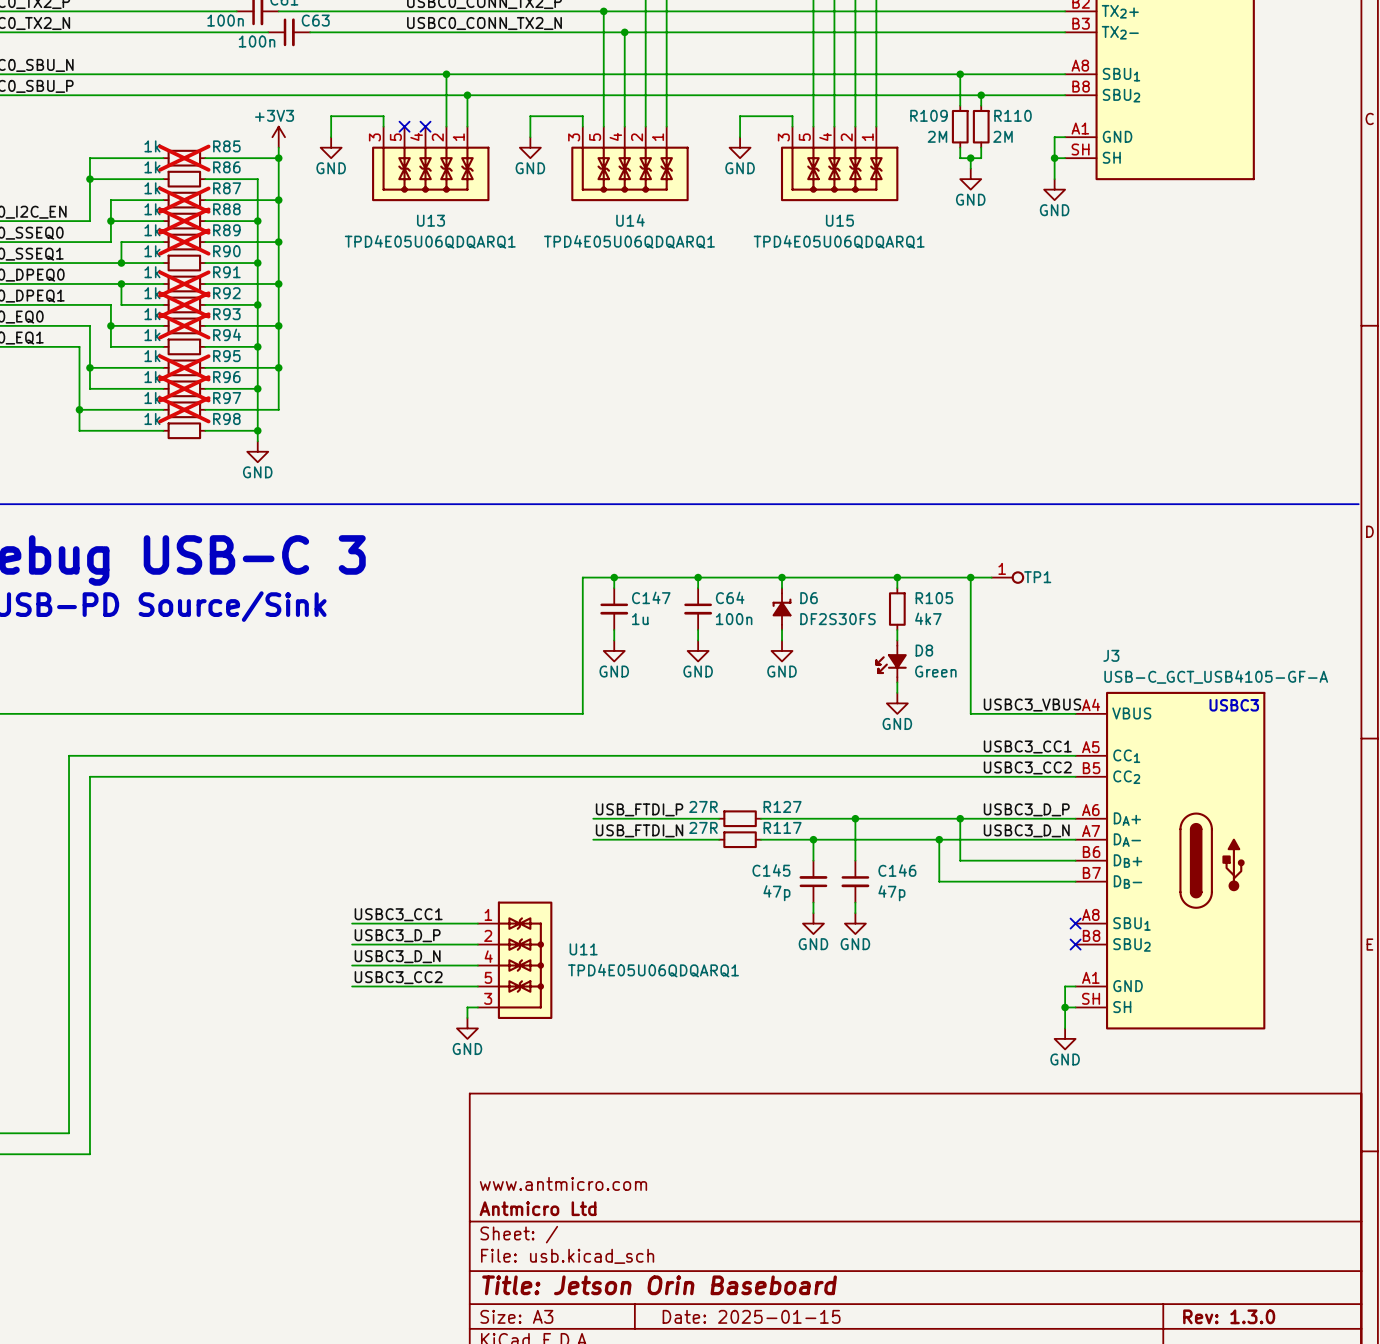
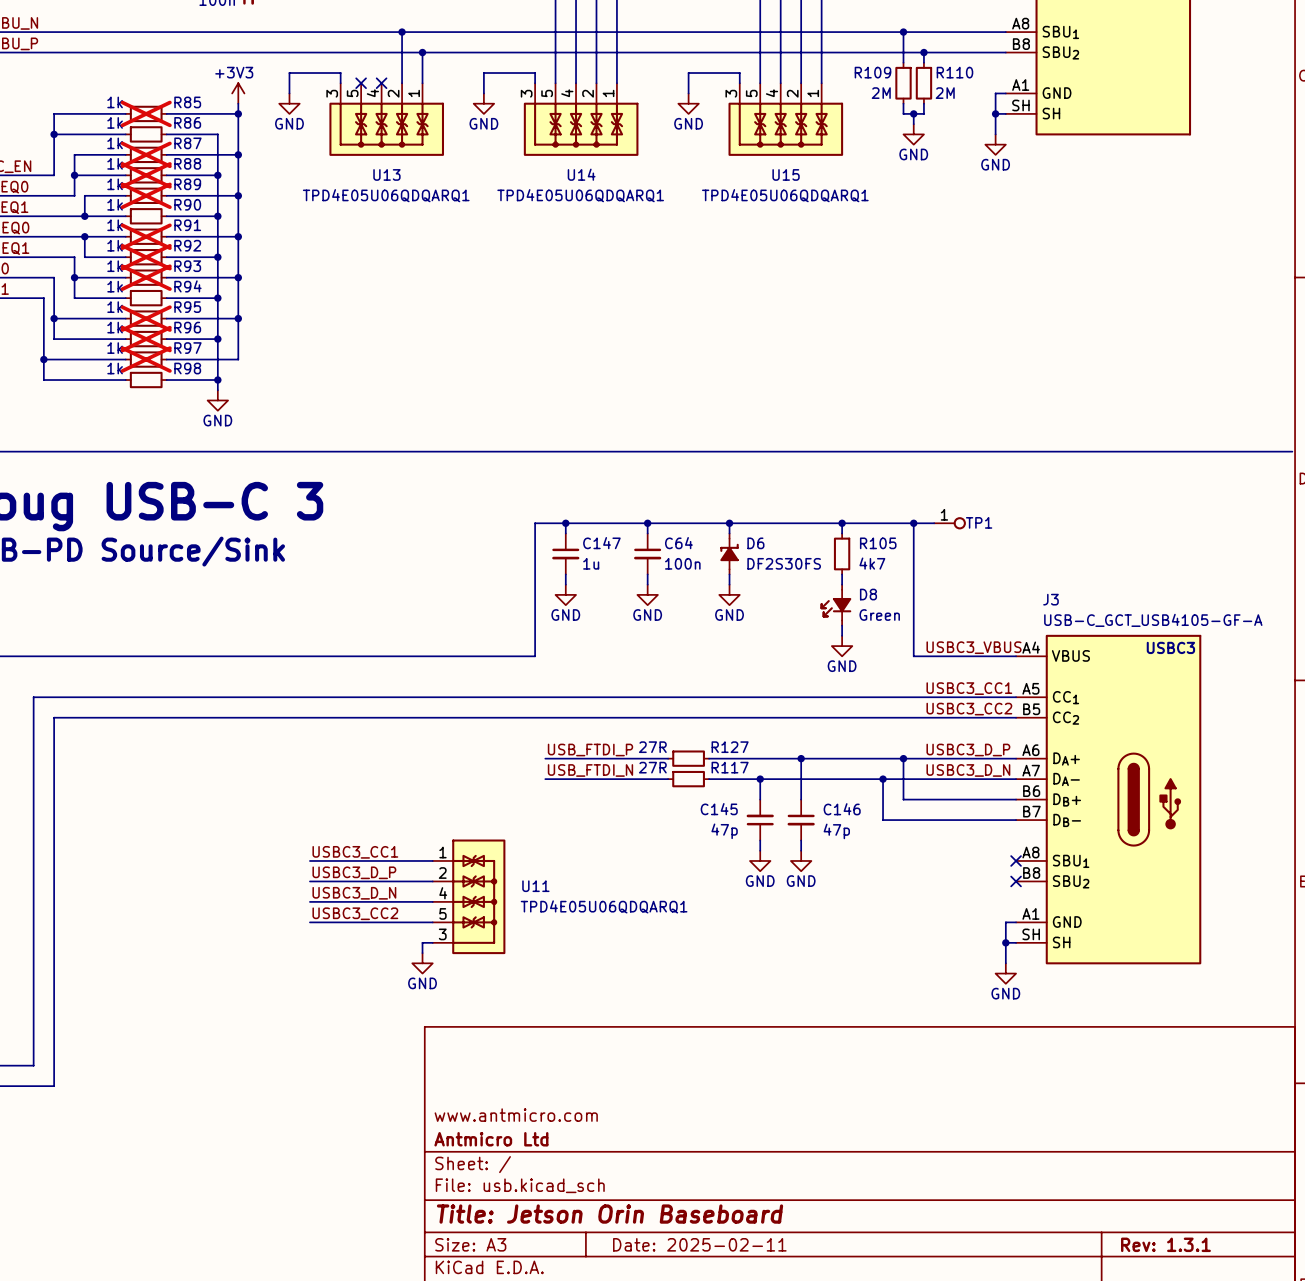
title block: Date: 2025-01-15 (751, 1316) -> Date: 2025-02-11 (699, 1244)
title block: Rev: 1.3.0 (1229, 1316) -> Rev: 1.3.1 (1165, 1244)

